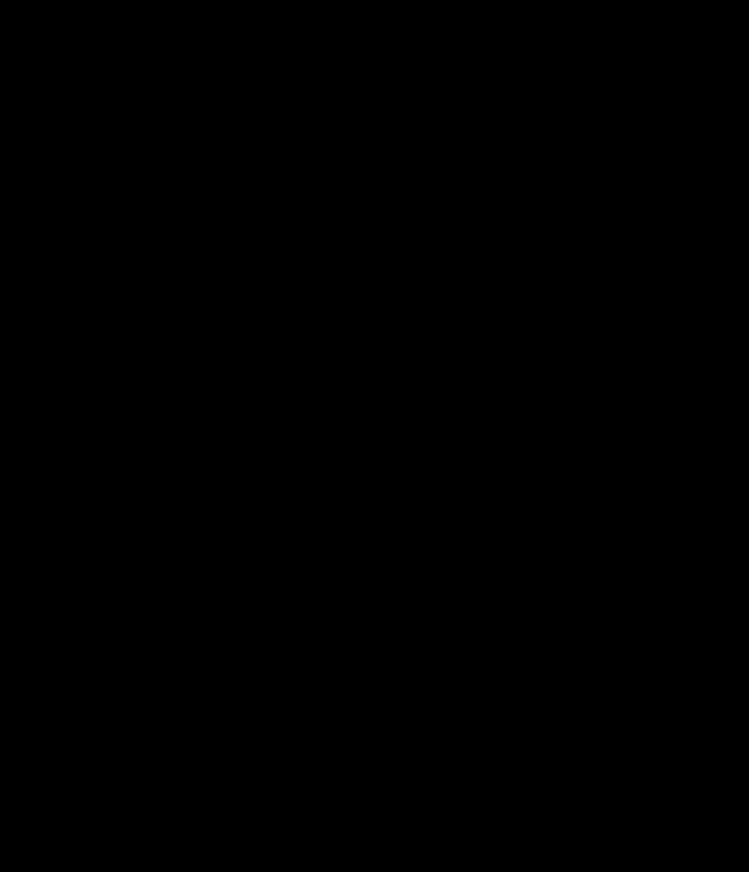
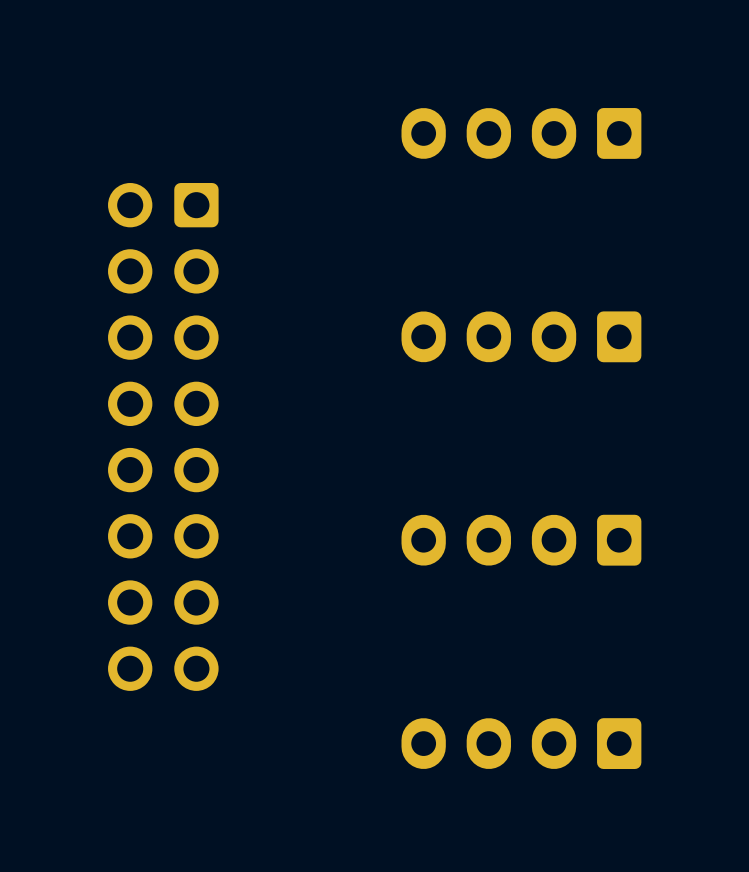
part: none -> (521, 133)
part: none -> (521, 336)
part: none -> (163, 436)
part: none -> (521, 540)
part: none -> (521, 743)

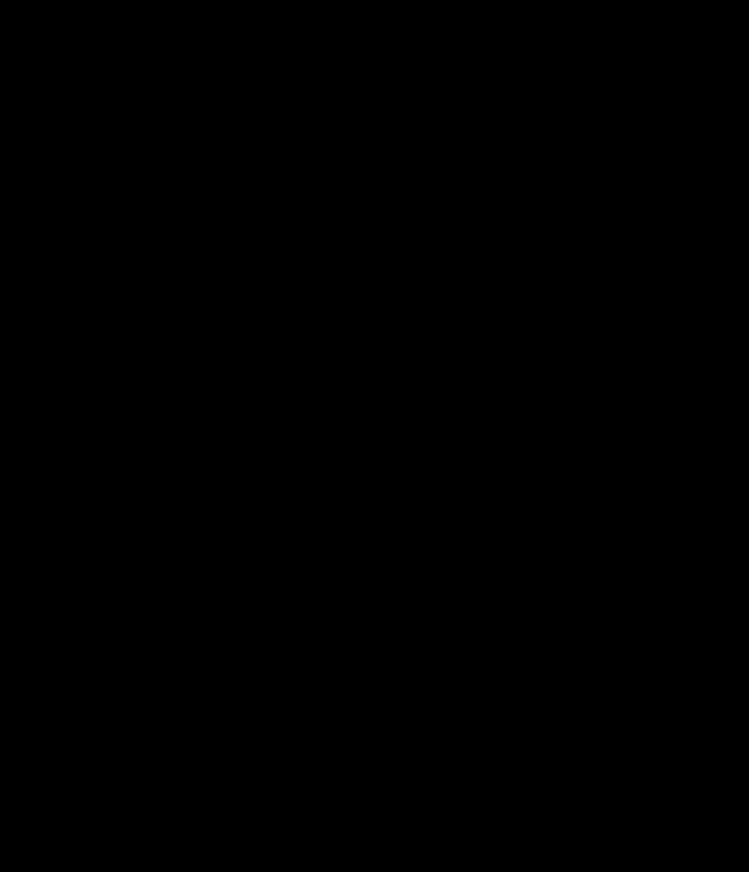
part: (521, 133) -> none
part: (521, 336) -> none
part: (163, 436) -> none
part: (521, 540) -> none
part: (521, 743) -> none

